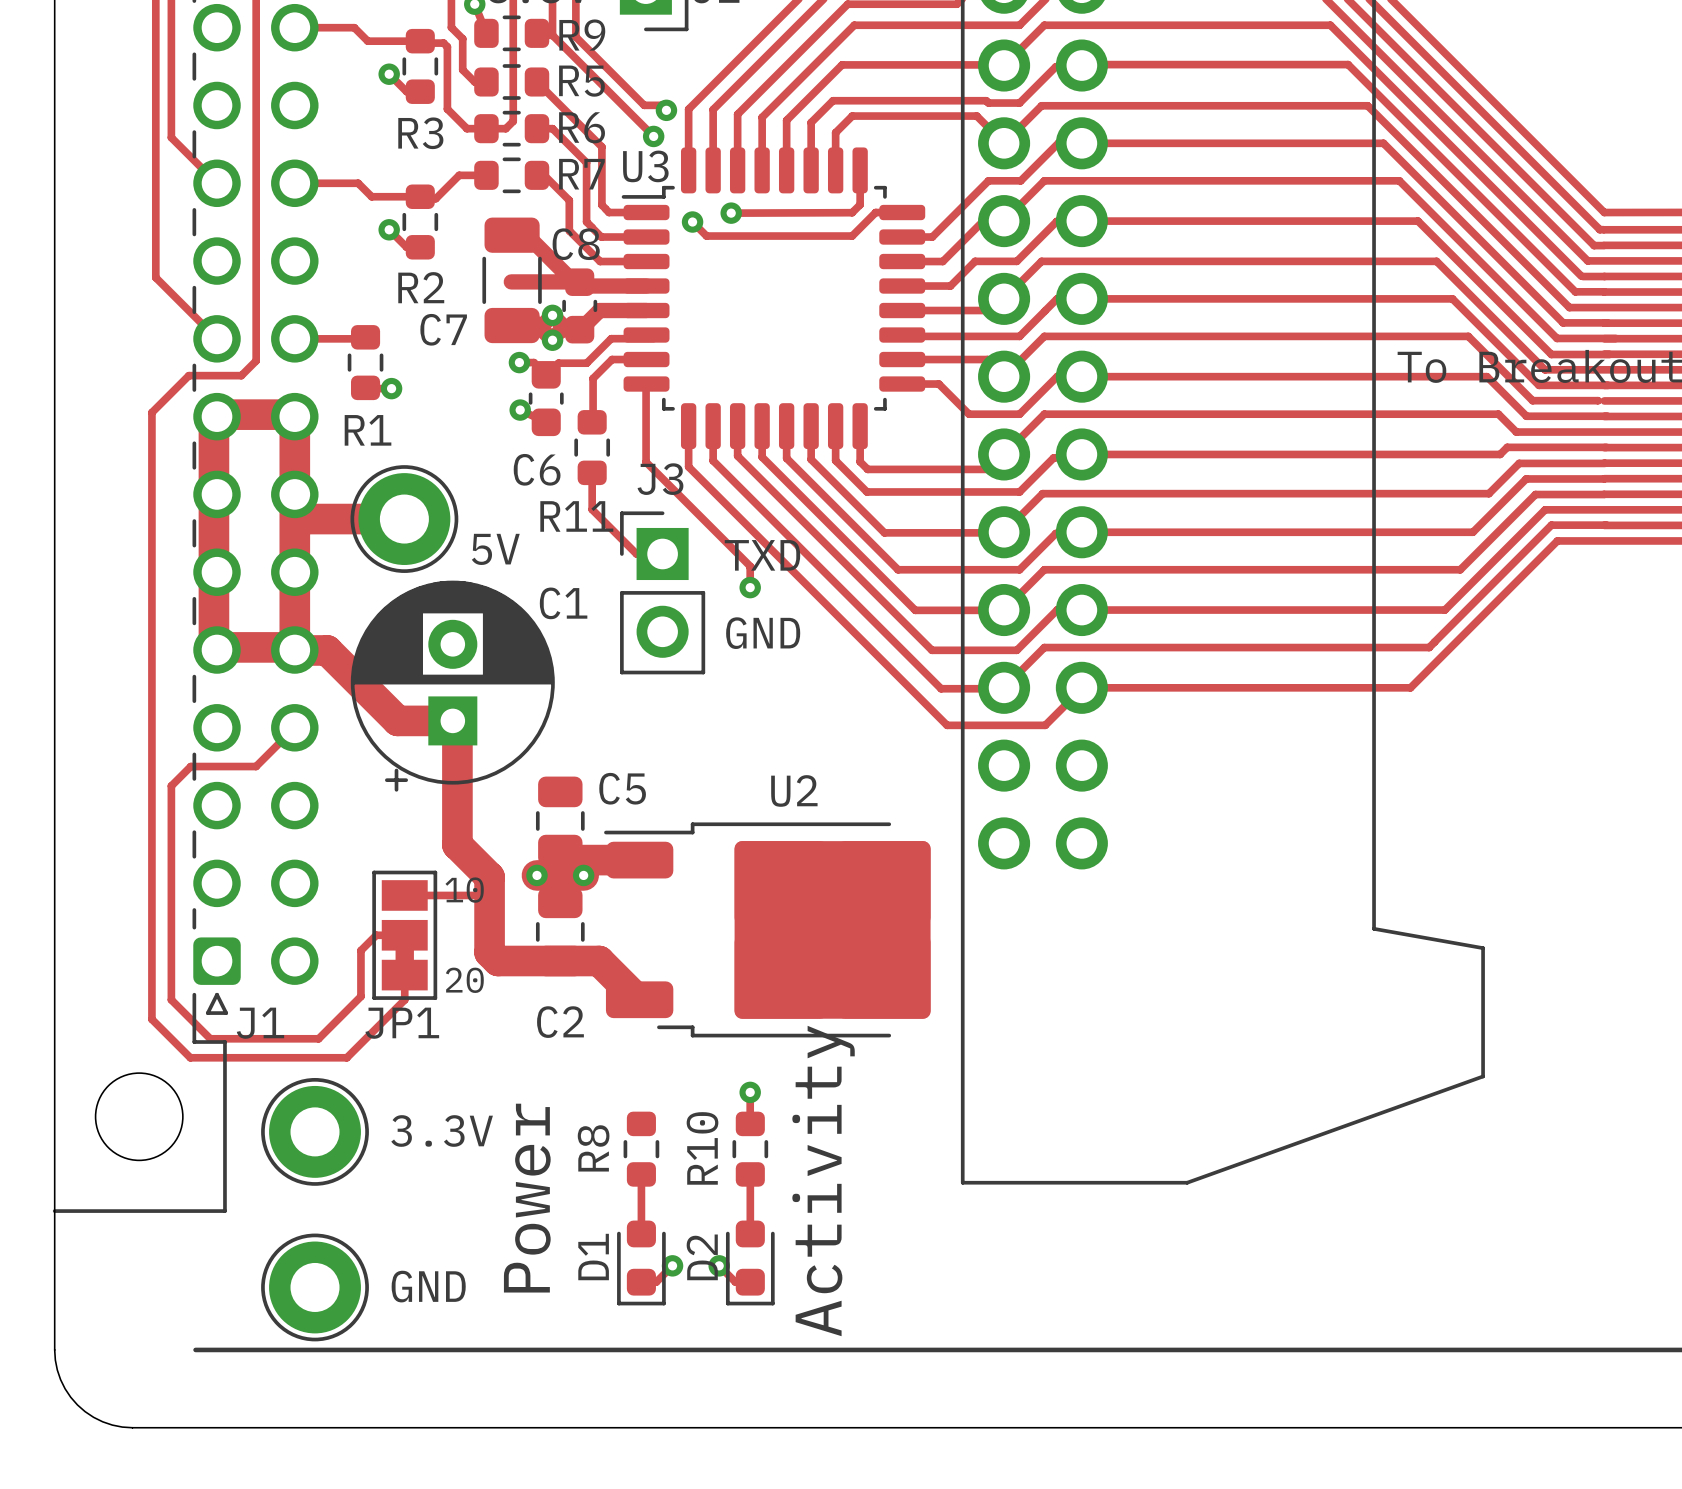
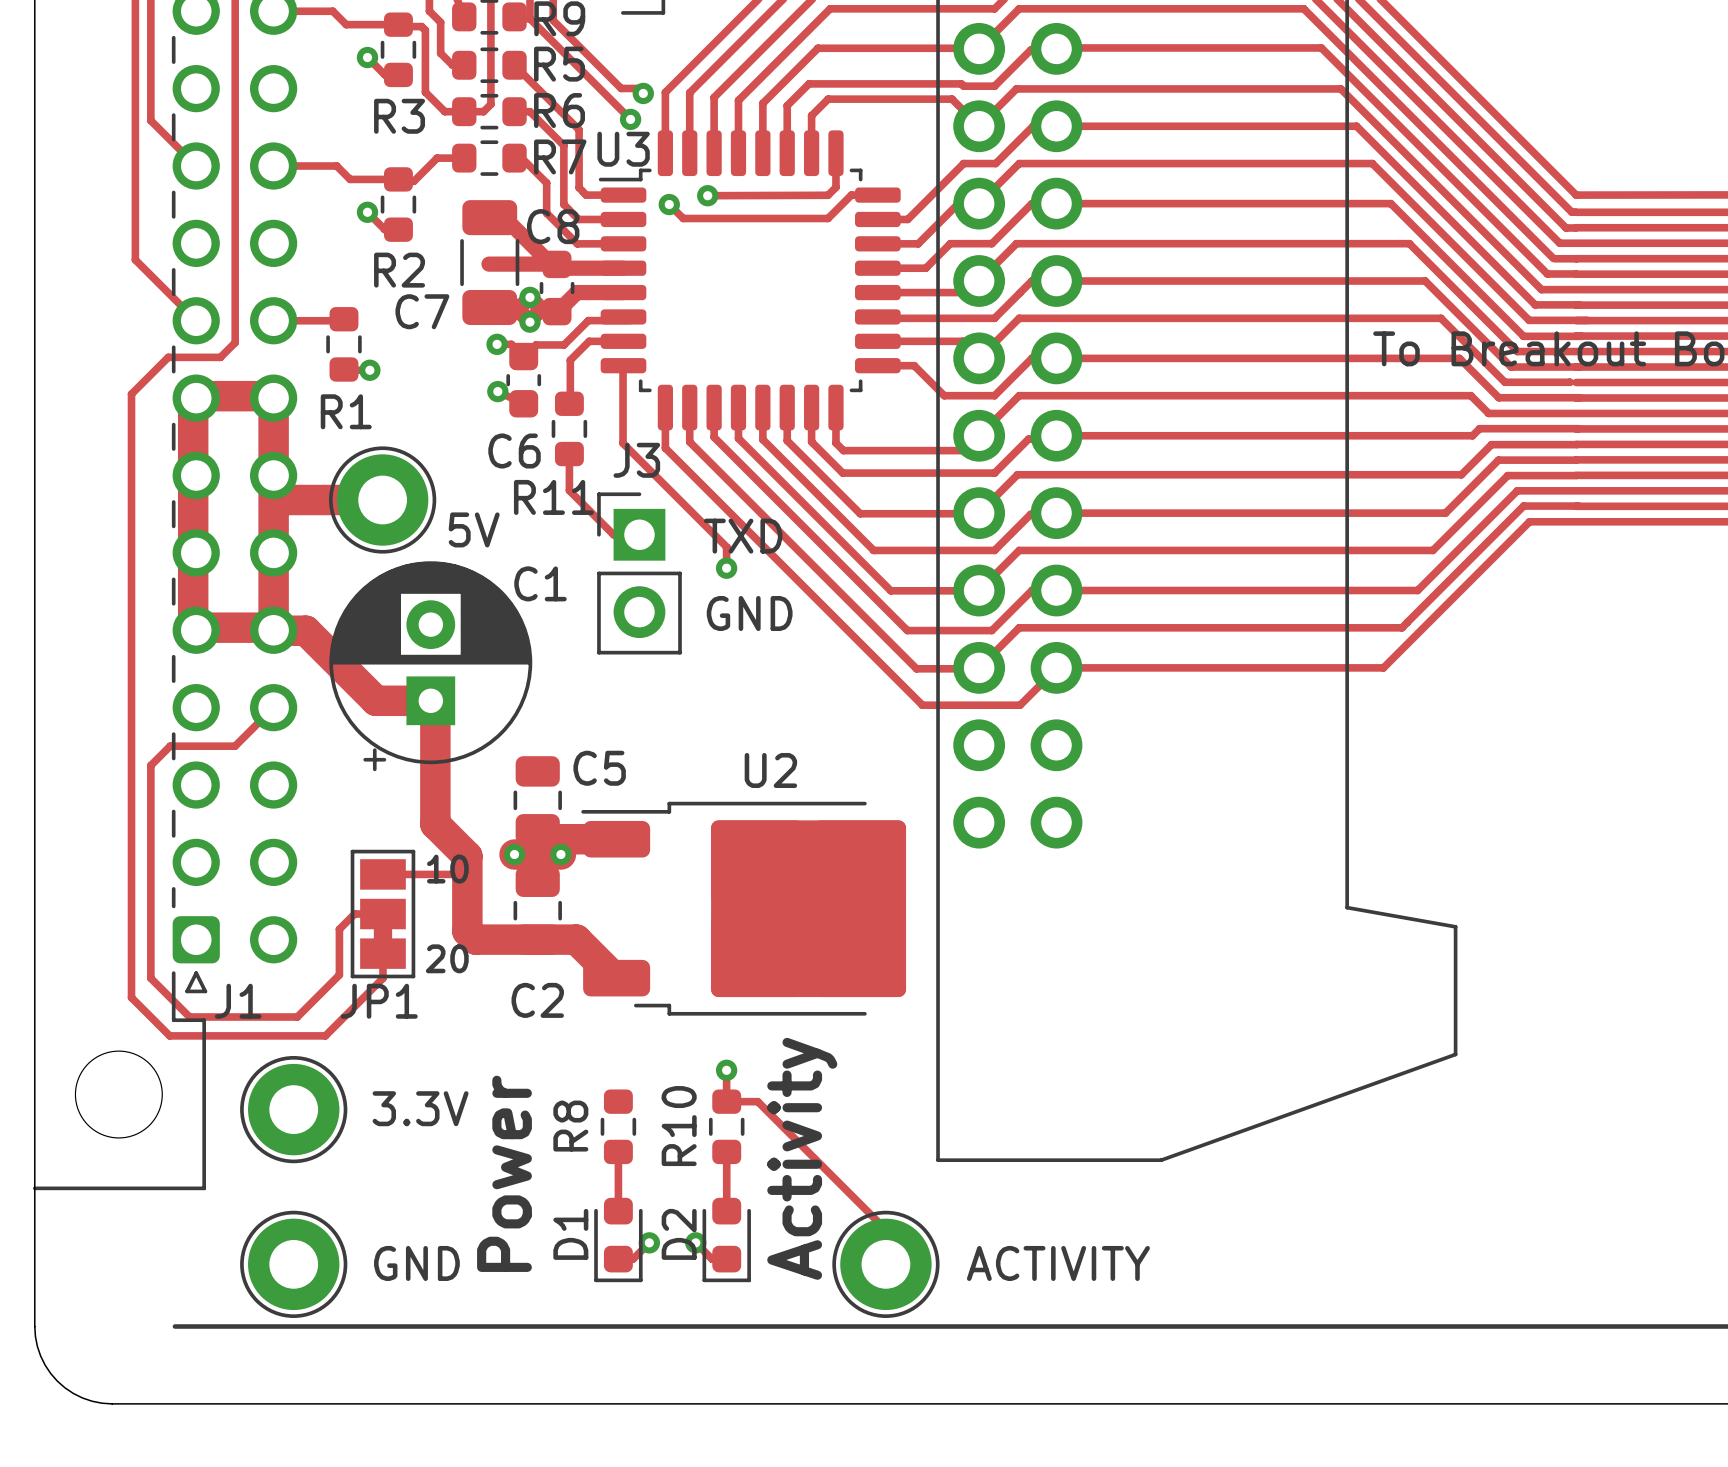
track: none -> (726, 1101) (757, 1101) (885, 1229)
text: none -> ACTIVITY (1058, 1263)
part: none -> (885, 1264)

